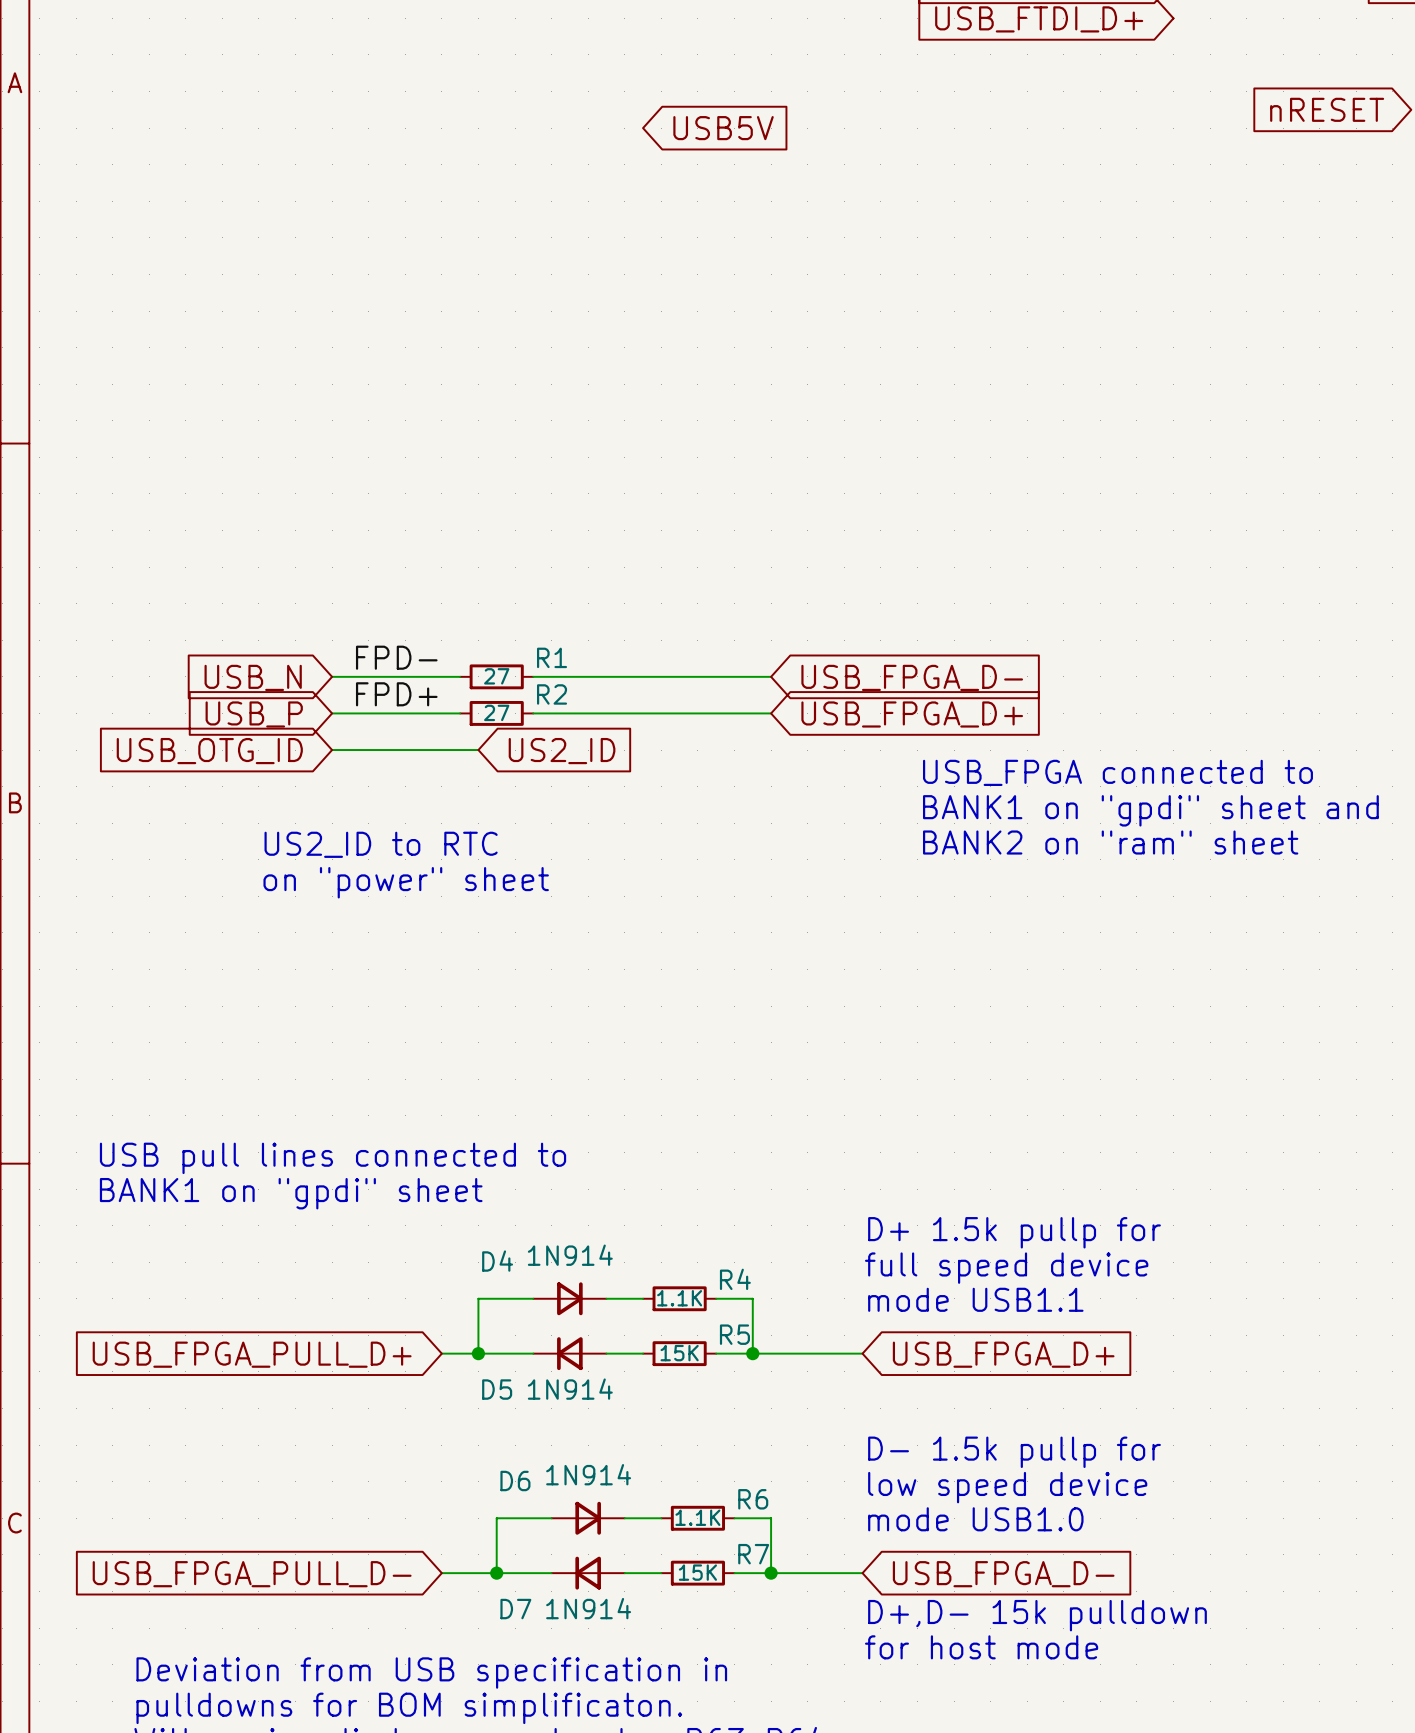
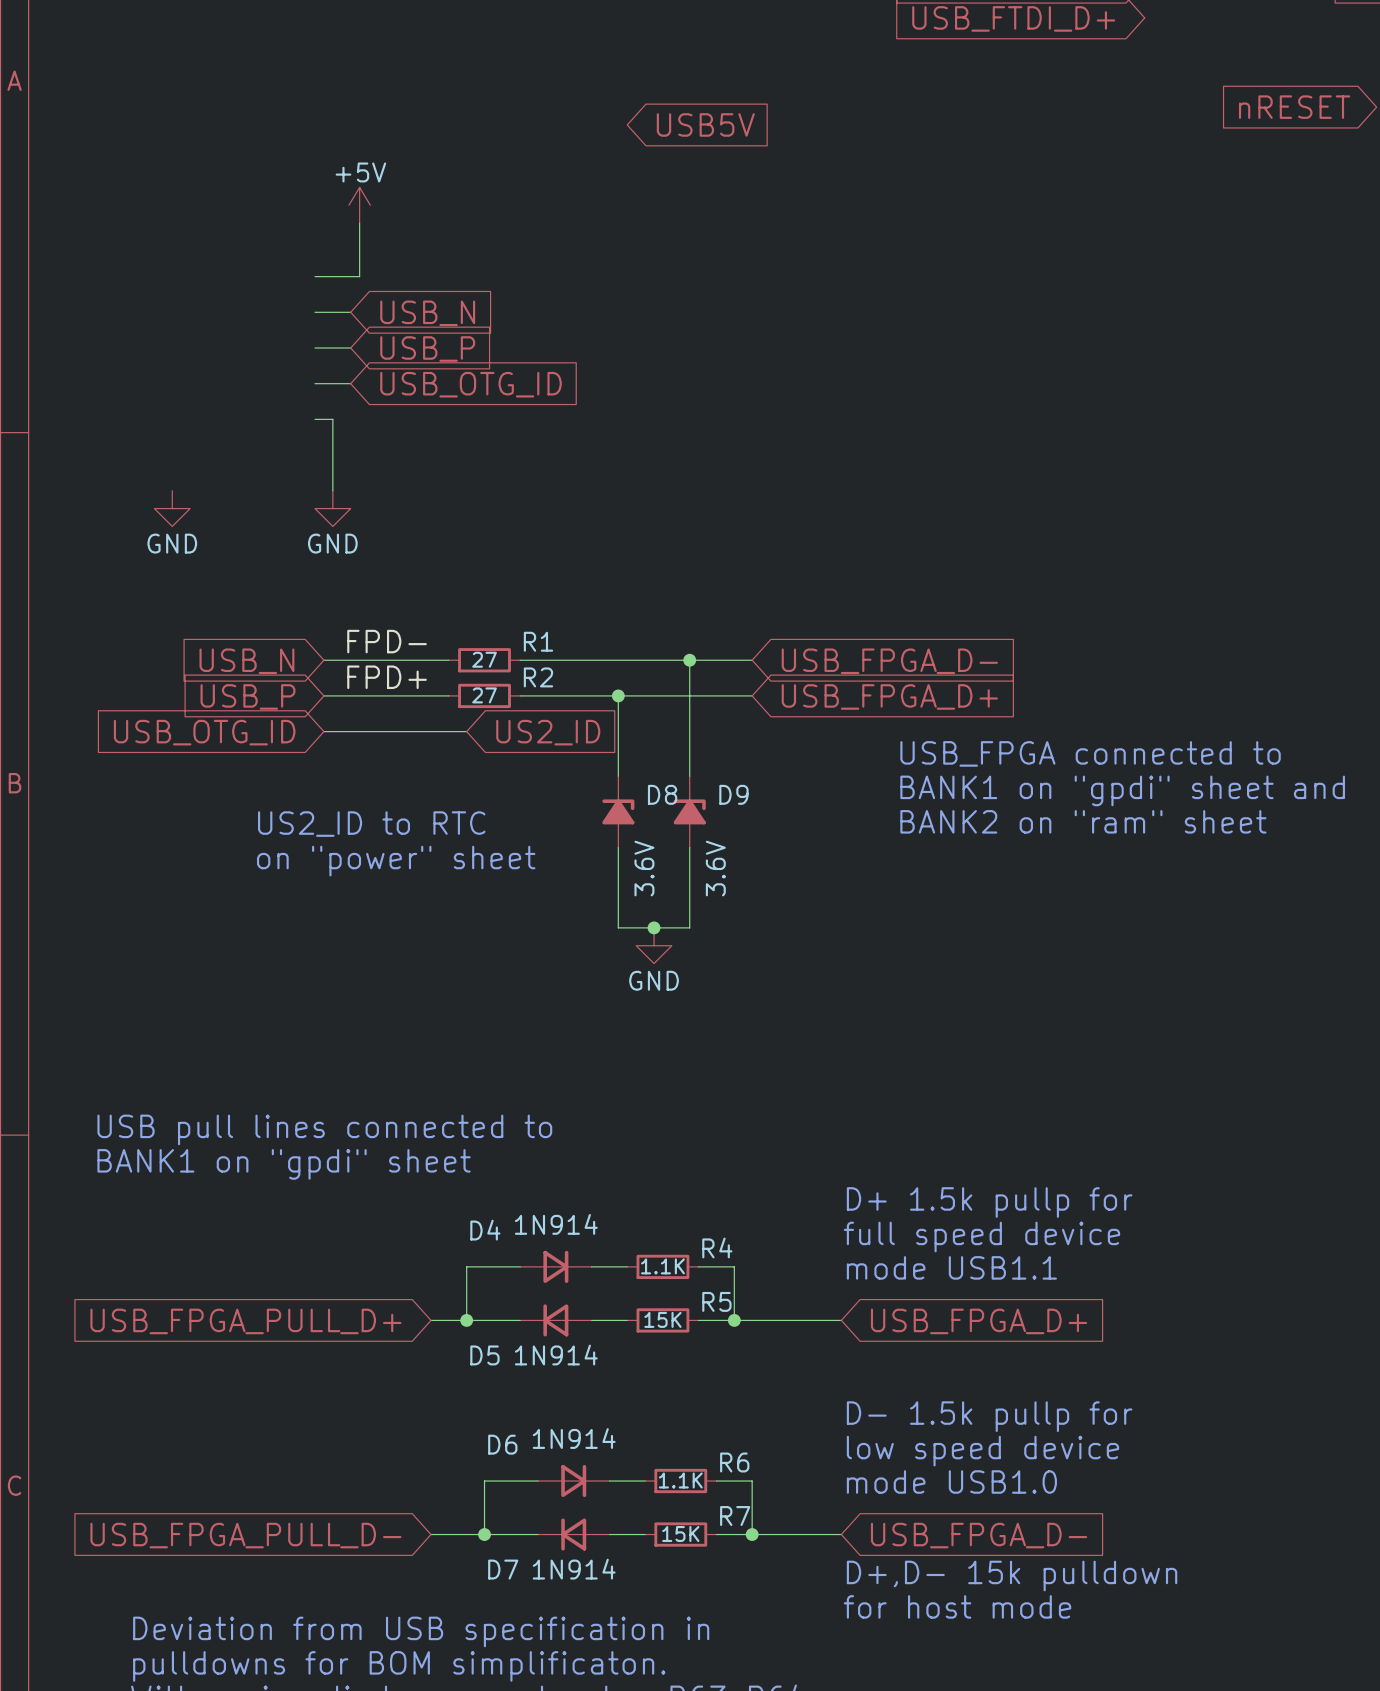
power symbol: none -> +5V (359, 205)
wire: none -> (359, 223) (359, 276) (315, 276)
wire: none -> (315, 312) (350, 312)
global label: none -> USB_N (427, 313)
wire: none -> (315, 348) (350, 348)
global label: none -> USB_P (427, 349)
wire: none -> (315, 383) (350, 383)
global label: none -> USB_OTG_ID (471, 384)
wire: none -> (315, 419) (332, 419) (332, 490)
power symbol: none -> GND (172, 508)
power symbol: none -> GND (332, 508)
wire: none -> (689, 660) (689, 776)
junction: none -> (689, 660)
wire: none -> (618, 695) (618, 776)
junction: none -> (618, 695)
D8: none -> 3.6V (618, 811)
D9: none -> 3.6V (689, 811)
wire: none -> (618, 847) (618, 927) (689, 927) (689, 847)
junction: none -> (654, 927)
power symbol: none -> GND (654, 945)

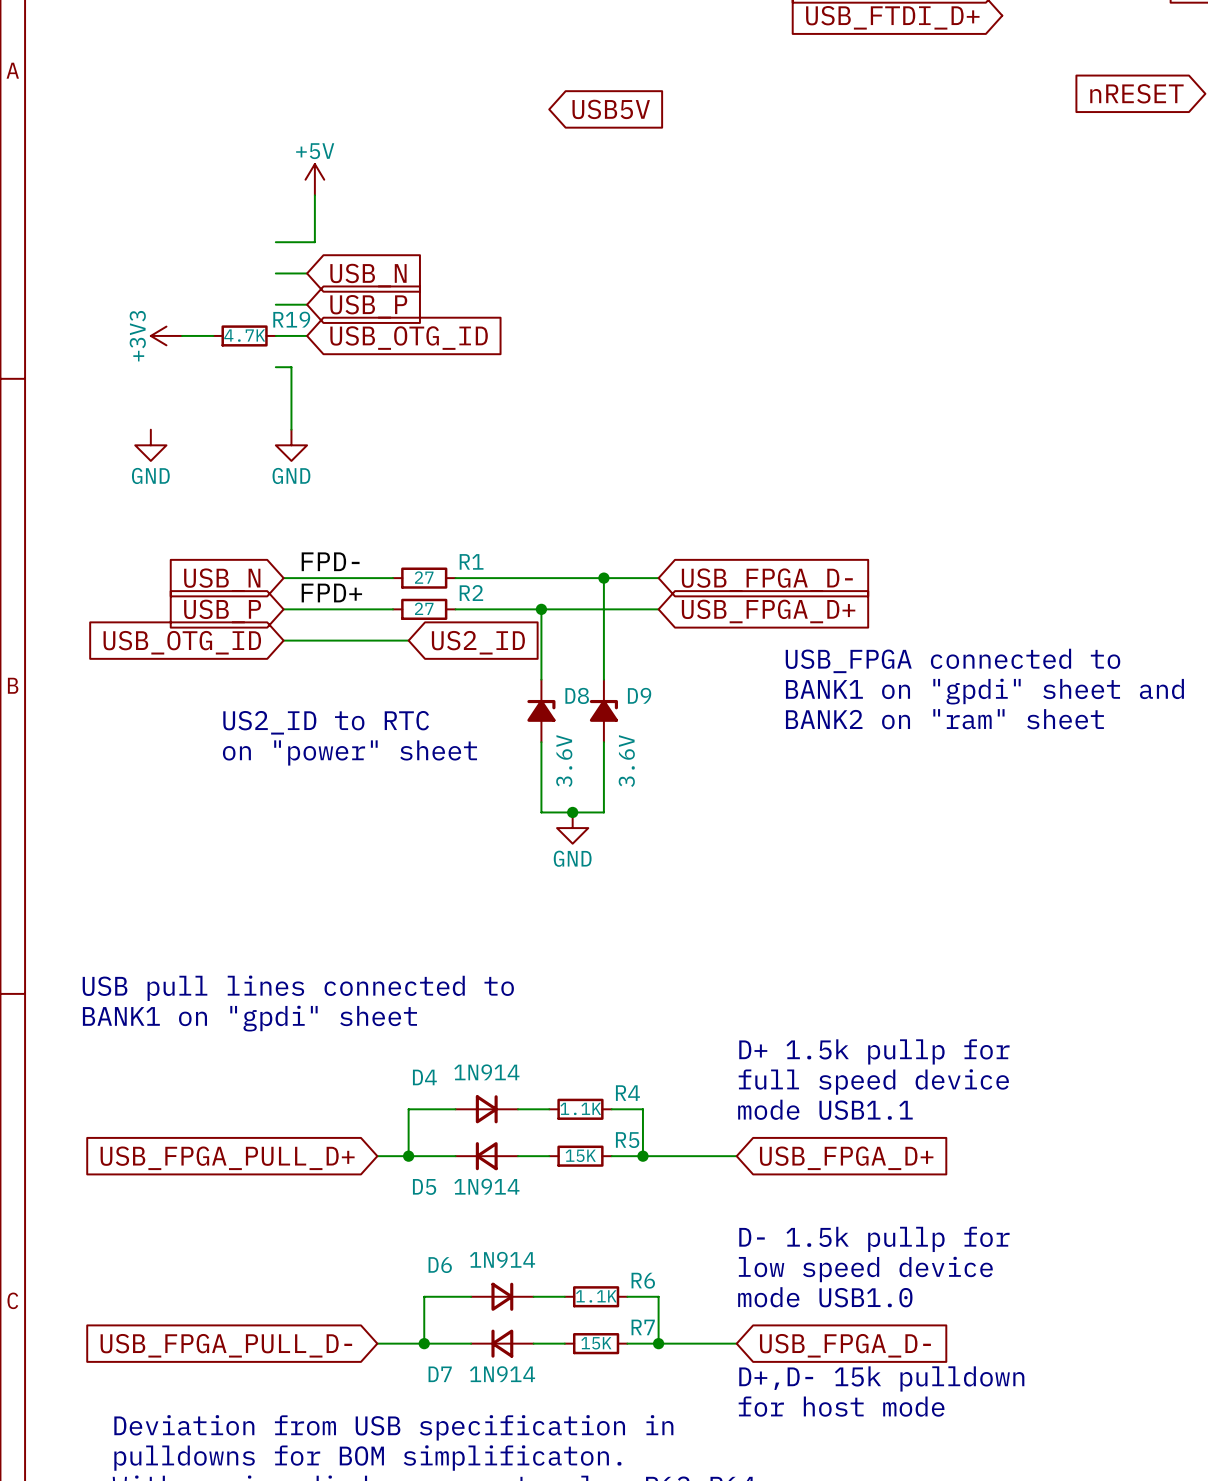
power symbol: none -> +3V3 (166, 335)
wire: none -> (182, 335) (213, 335)
R19: none -> 4.7K (244, 335)

